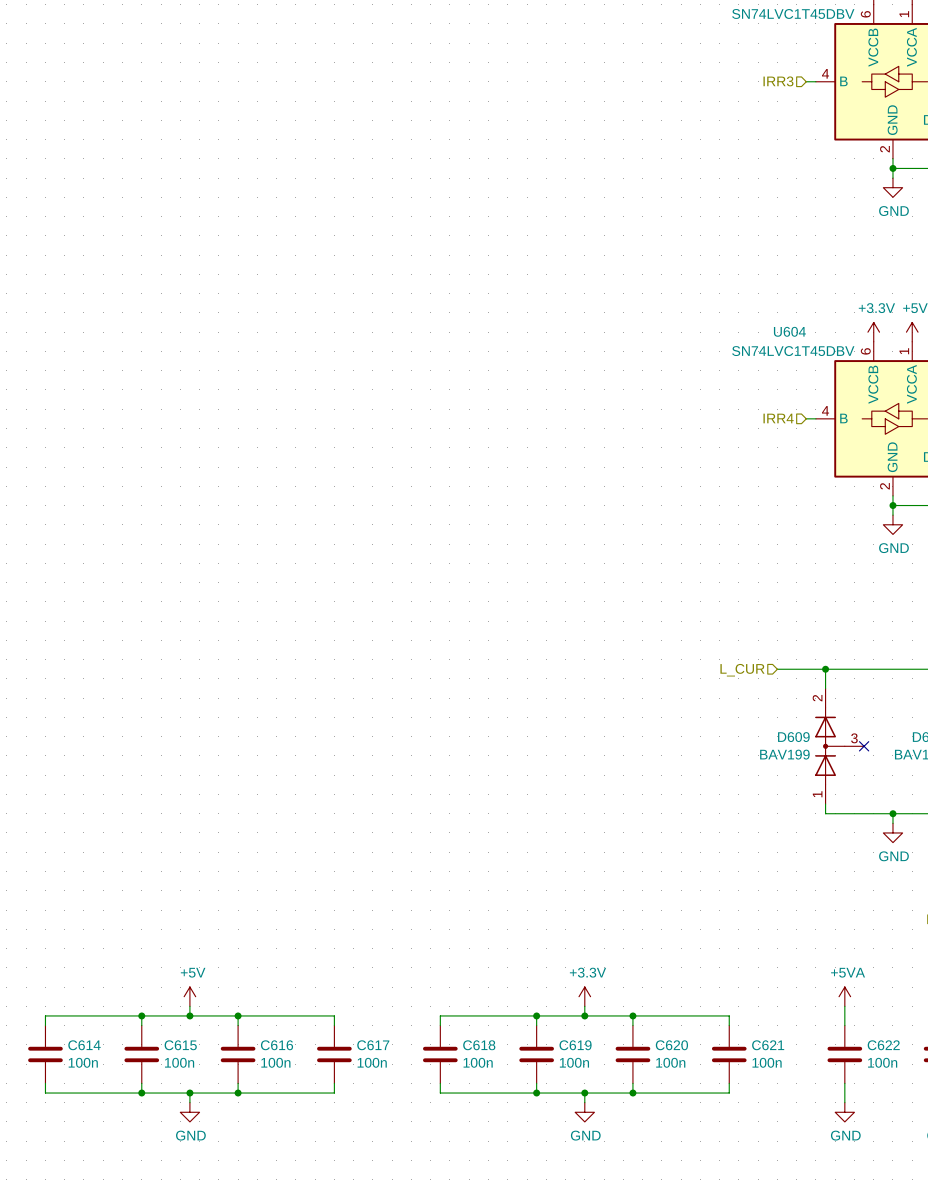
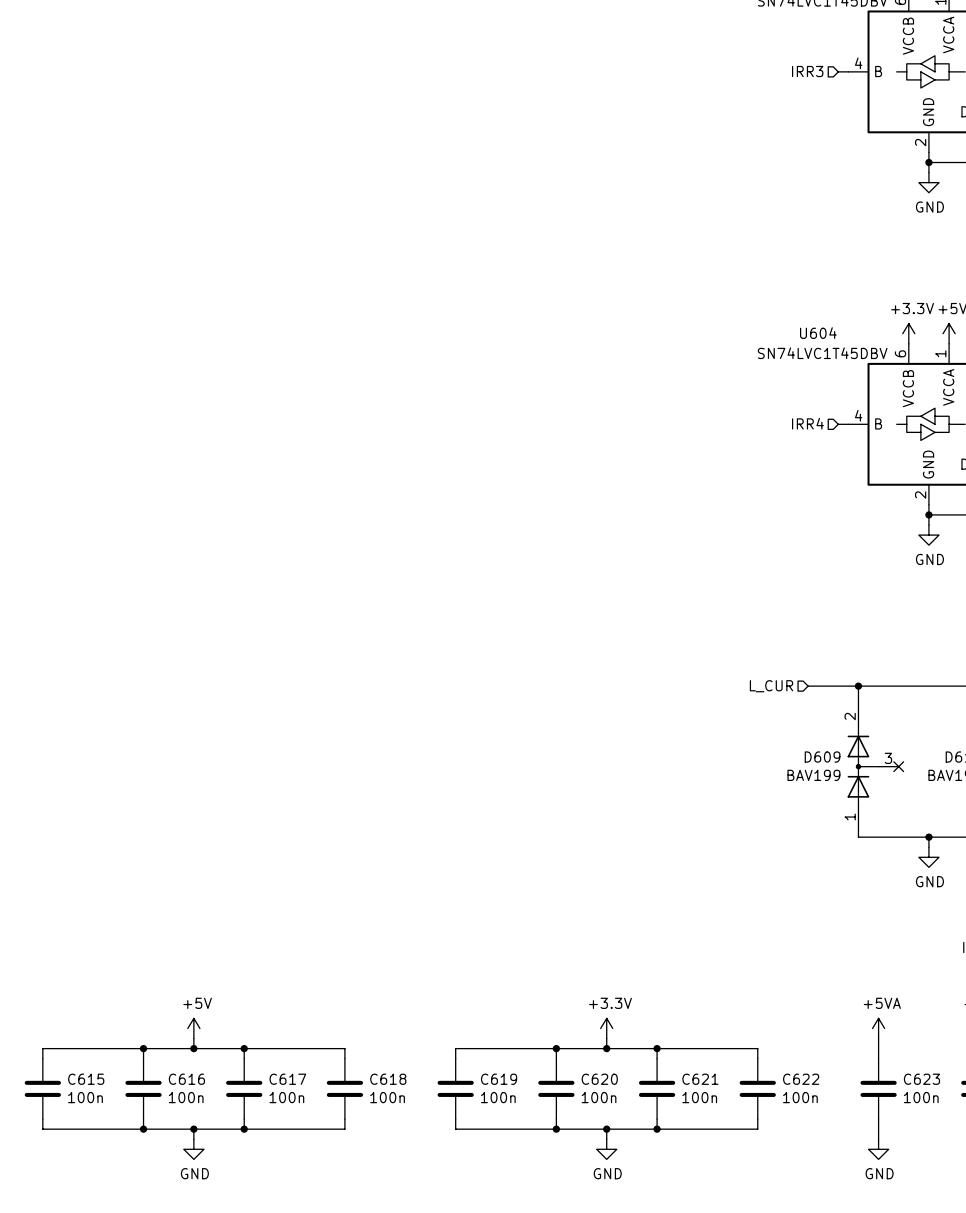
C614 name: C614 (84, 1045) -> C615 (86, 1079)
C615 name: C615 (180, 1045) -> C616 (186, 1079)
C616 name: C616 (277, 1045) -> C617 (287, 1079)
C617 name: C617 (373, 1045) -> C618 (388, 1079)
C618 name: C618 (479, 1045) -> C619 (499, 1079)
C619 name: C619 (575, 1045) -> C620 (599, 1079)
C620 name: C620 (671, 1045) -> C621 (700, 1079)
C621 name: C621 (768, 1045) -> C622 (801, 1079)
C622 name: C622 (883, 1045) -> C623 (921, 1079)

